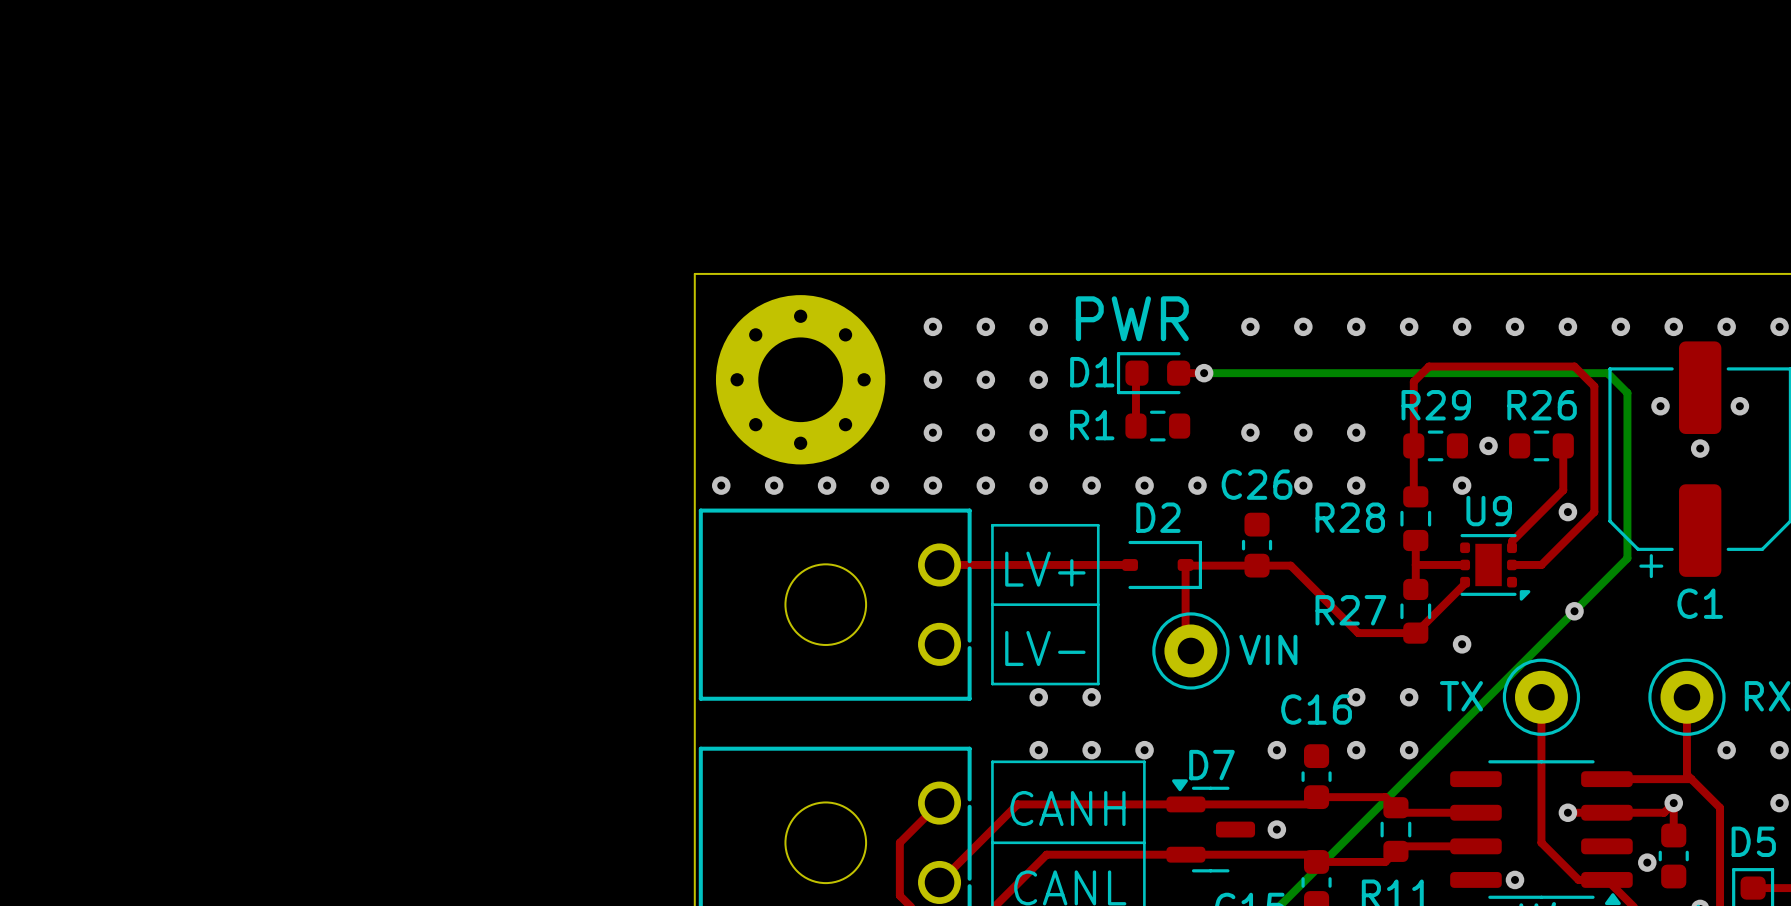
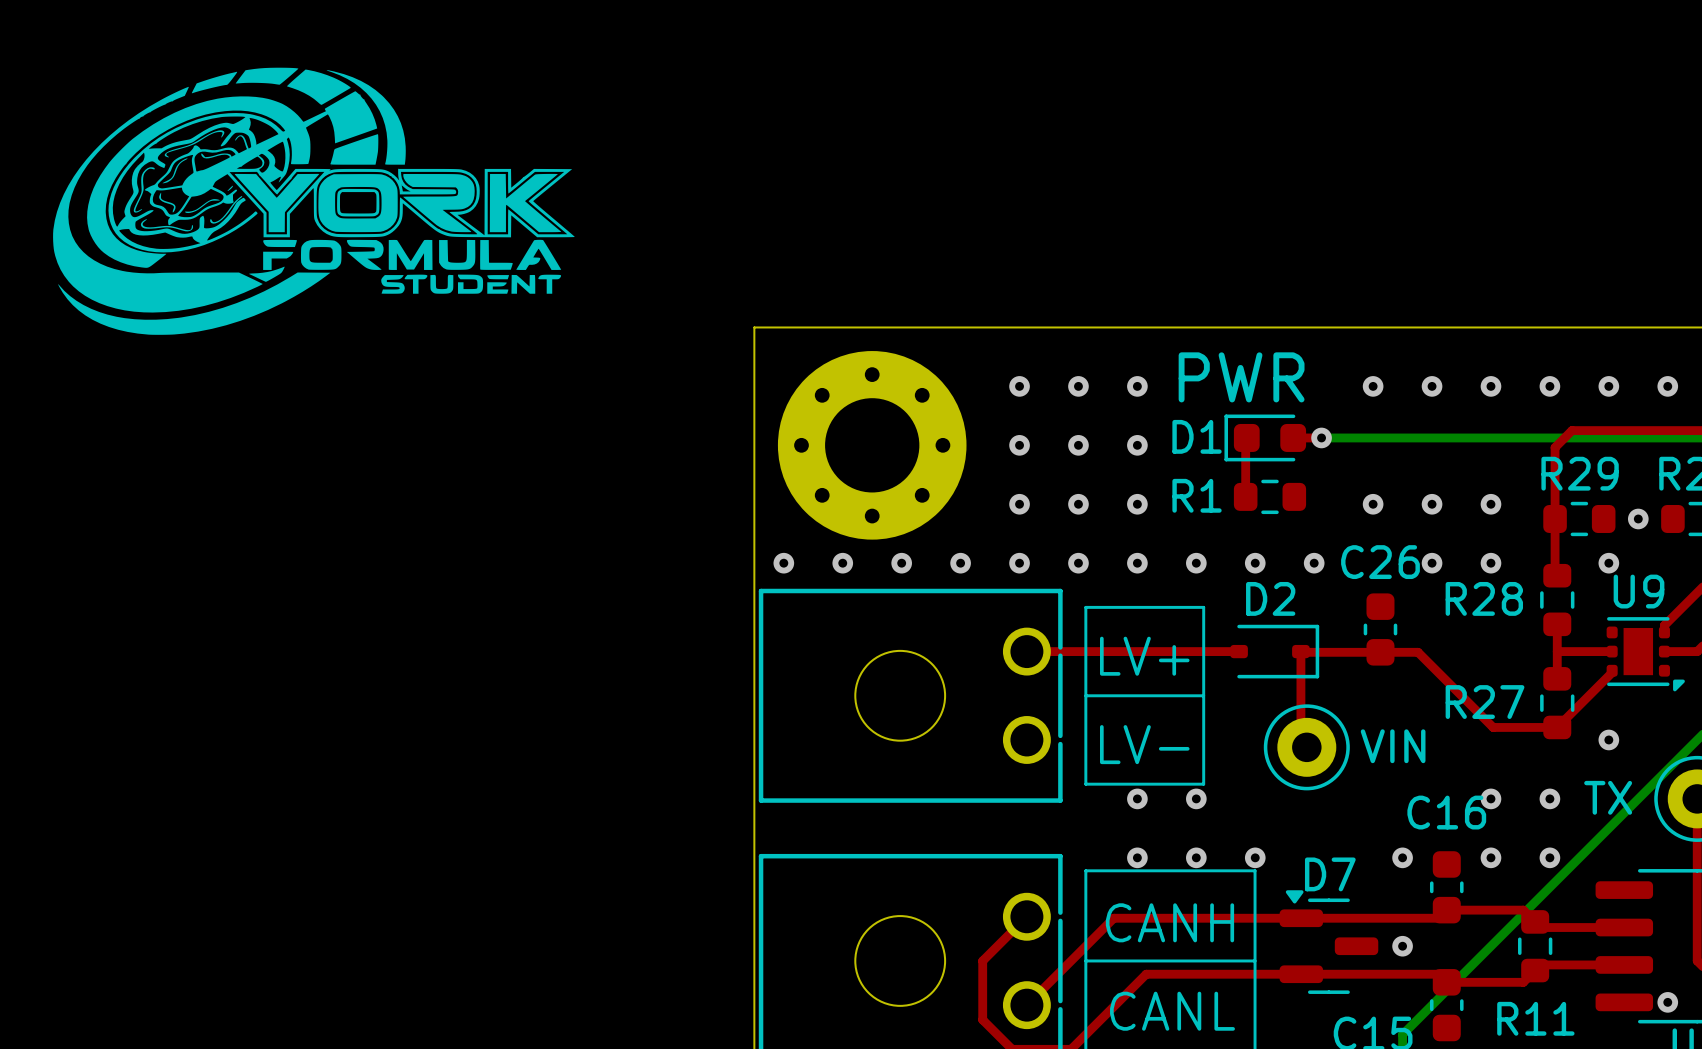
drawing: none -> [53, 67, 575, 335]

